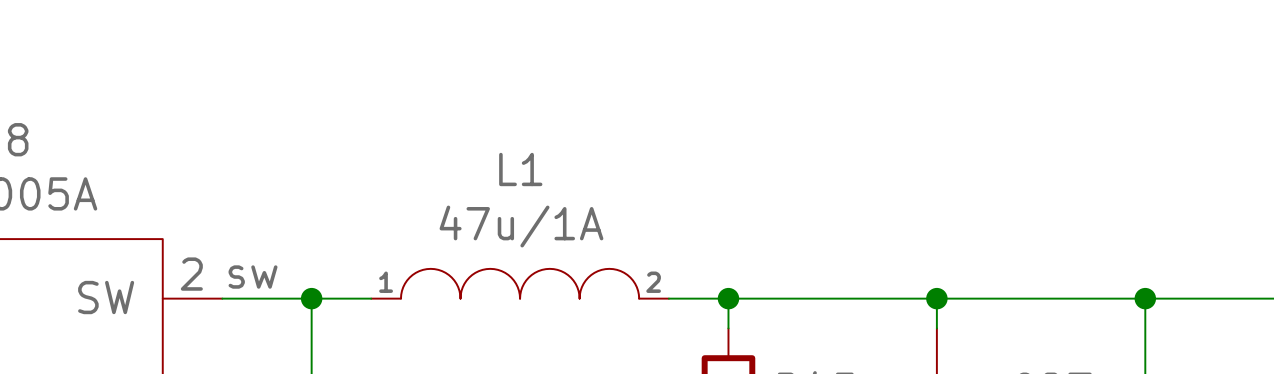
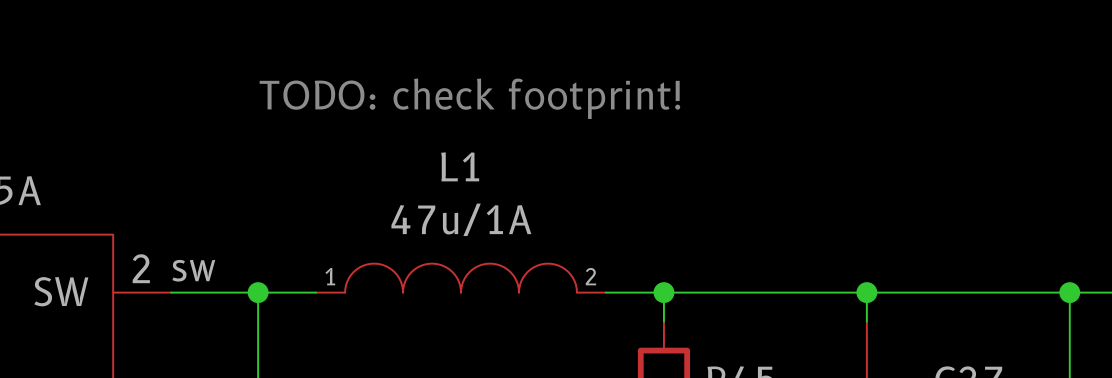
text: none -> TODO: check footprint! (469, 98)

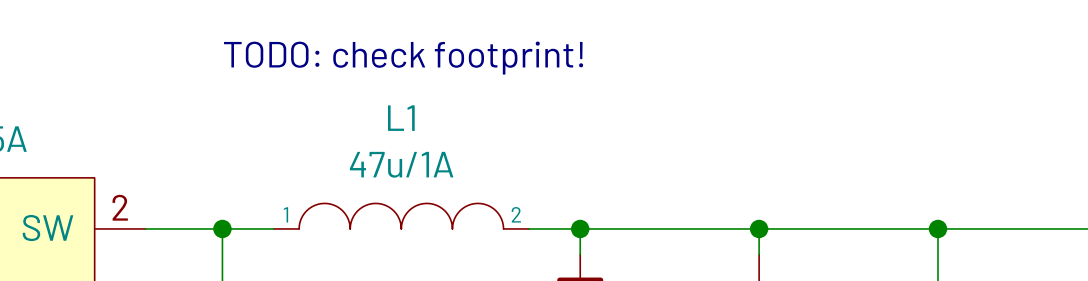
label: sw (193, 270) -> none

